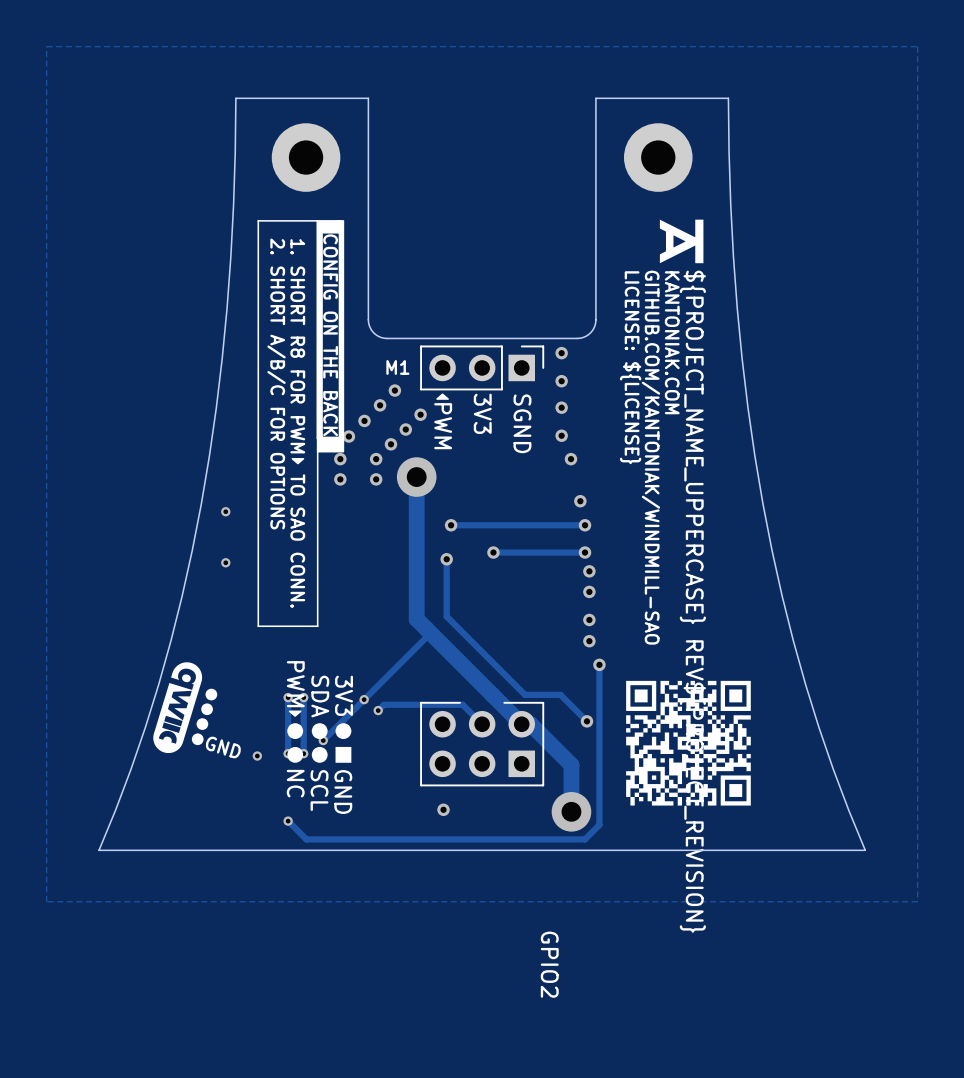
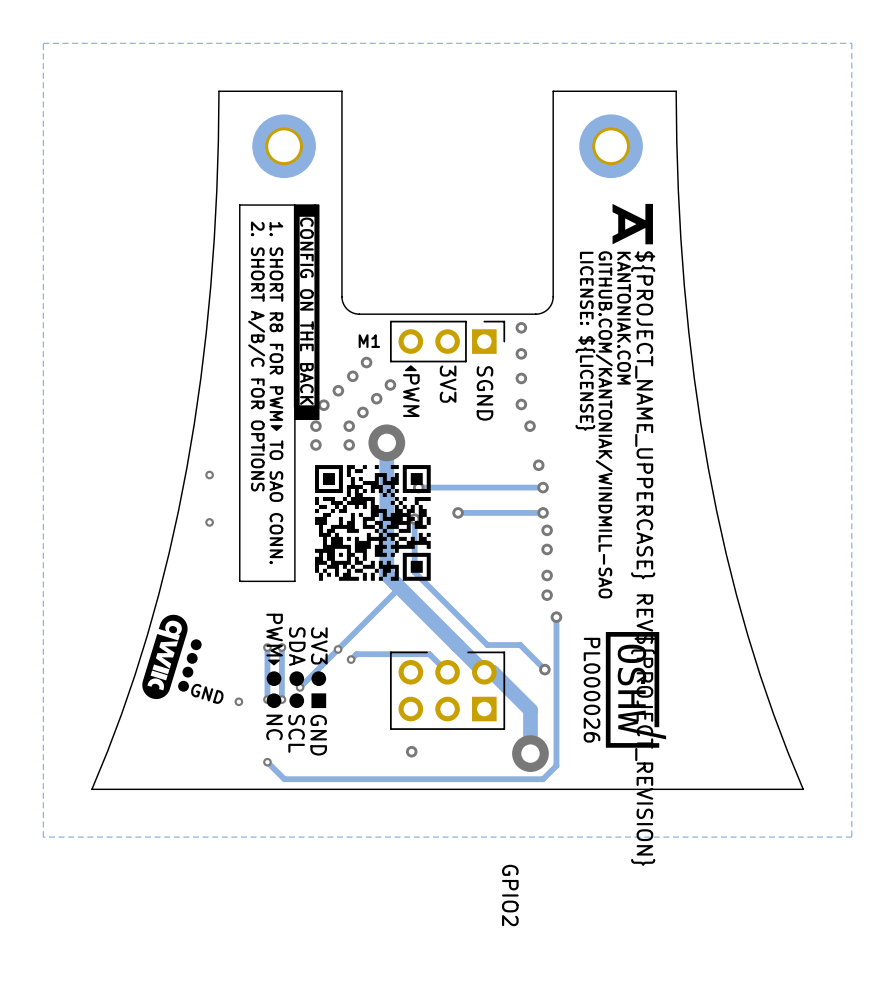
drawing: none -> [315, 465, 431, 581]
drawing: [626, 680, 751, 806] -> none
drawing: none -> [617, 644, 647, 664]
drawing shape: [677, 723, 683, 729] -> [617, 667, 647, 686]
drawing shape: [677, 741, 683, 746] -> [605, 632, 660, 748]
text: none -> PL000026 (592, 690)
drawing: none -> [618, 690, 667, 740]

